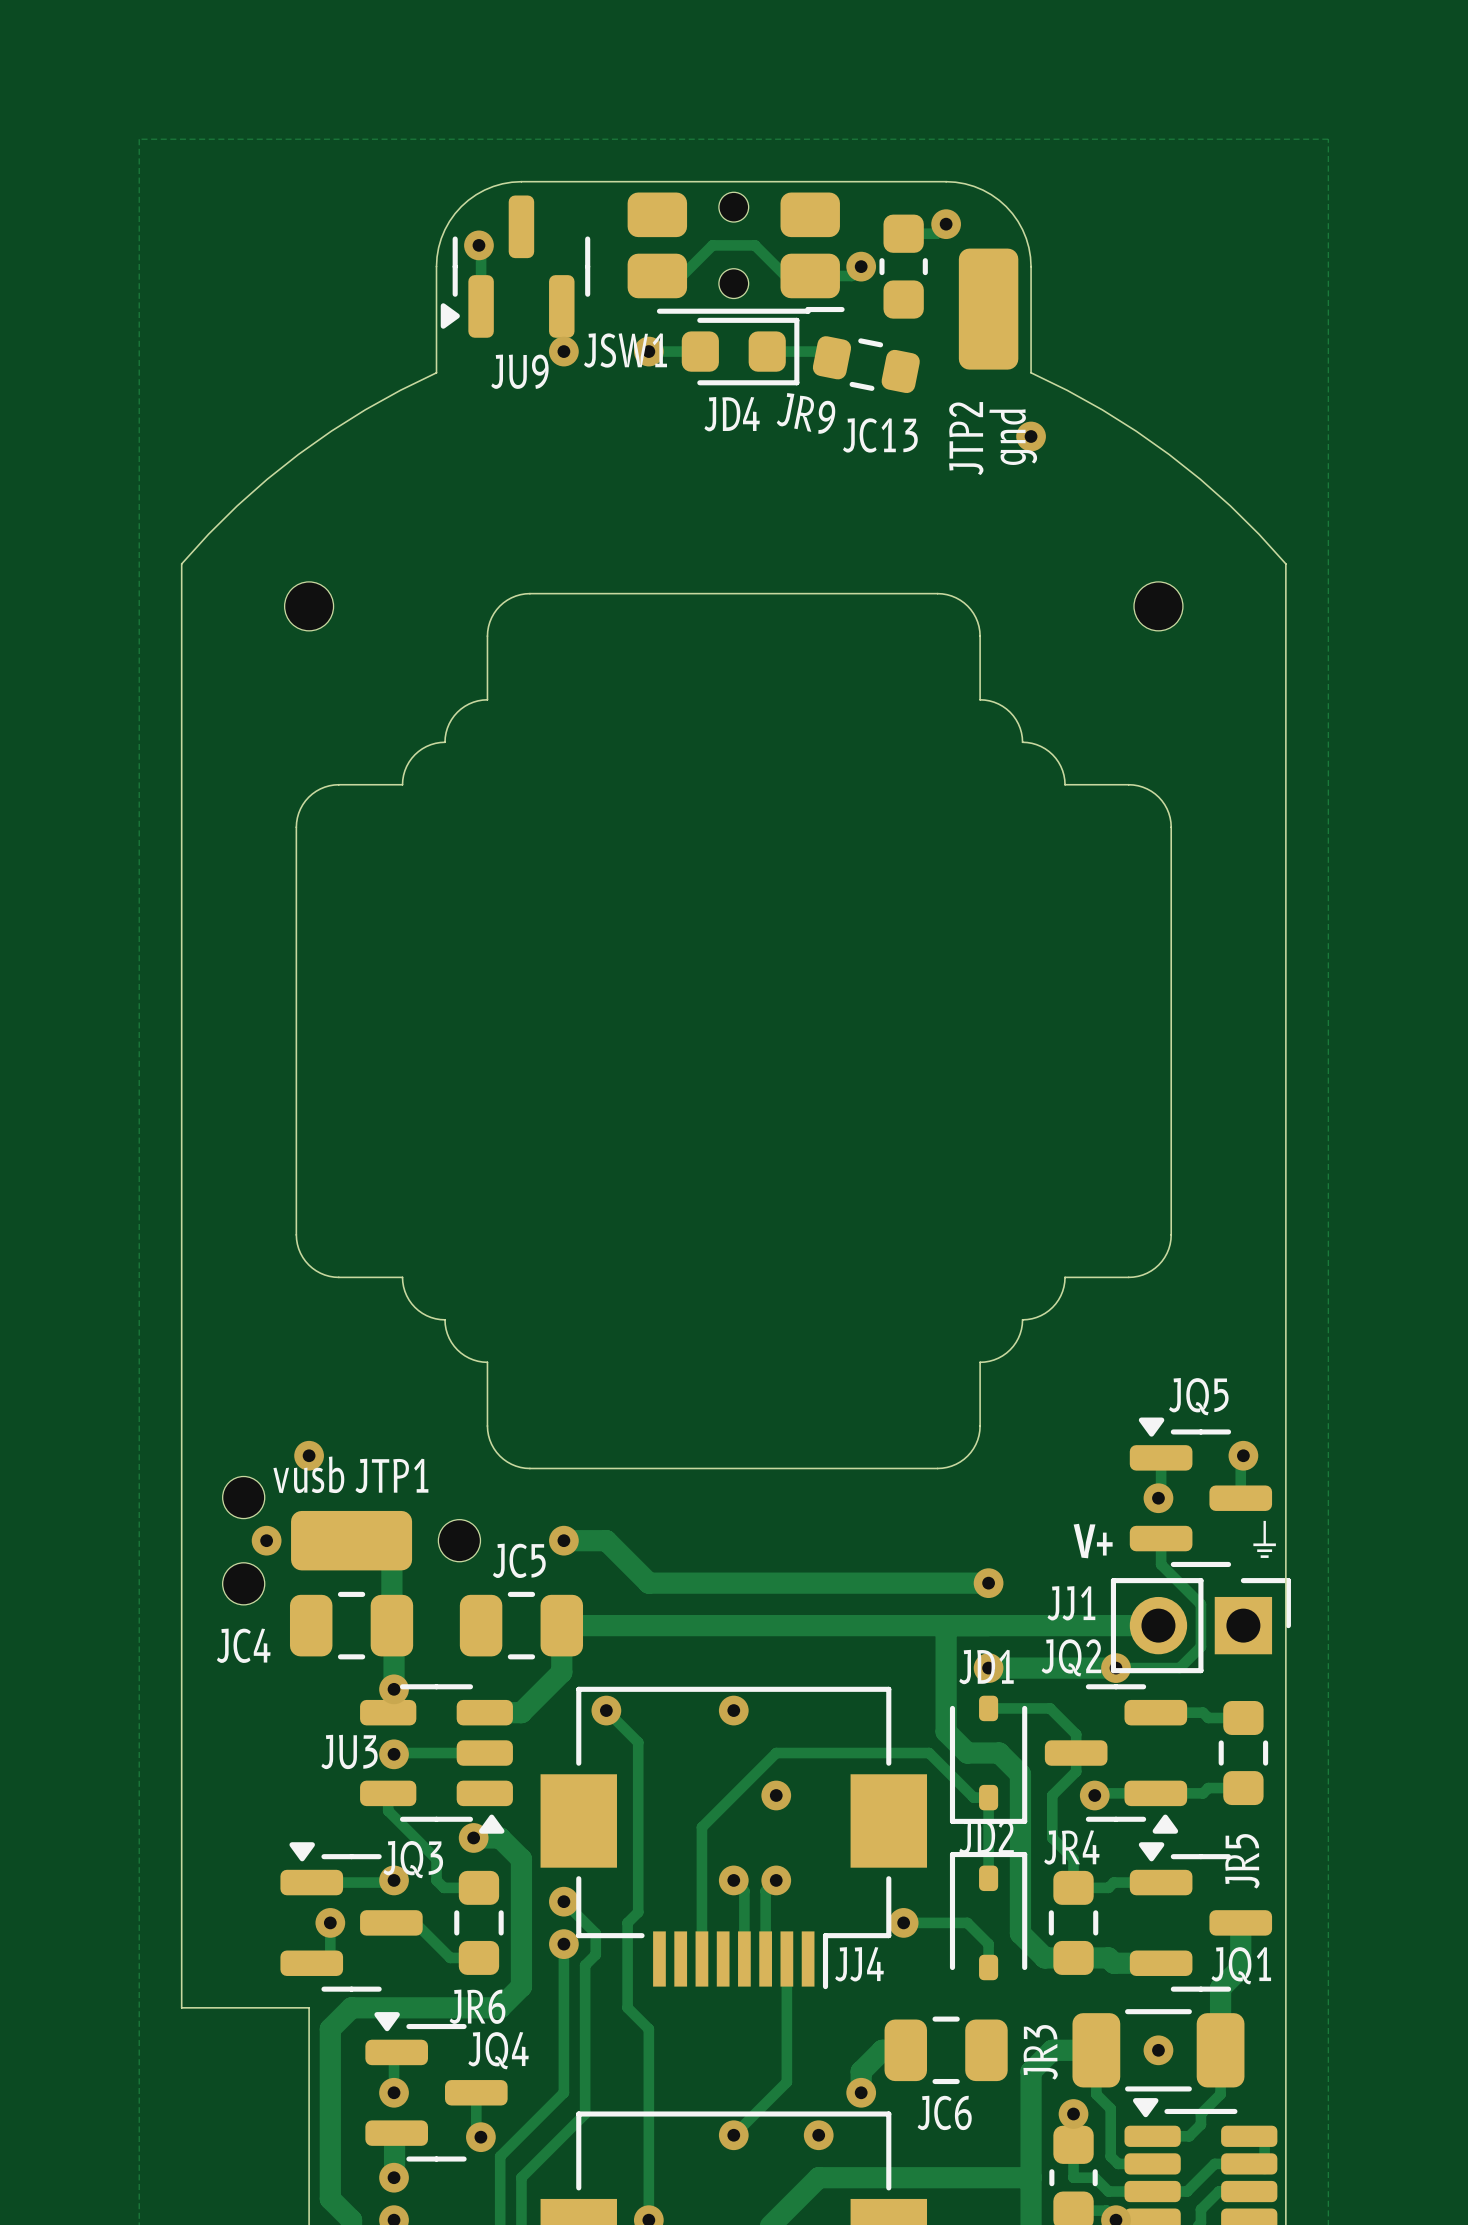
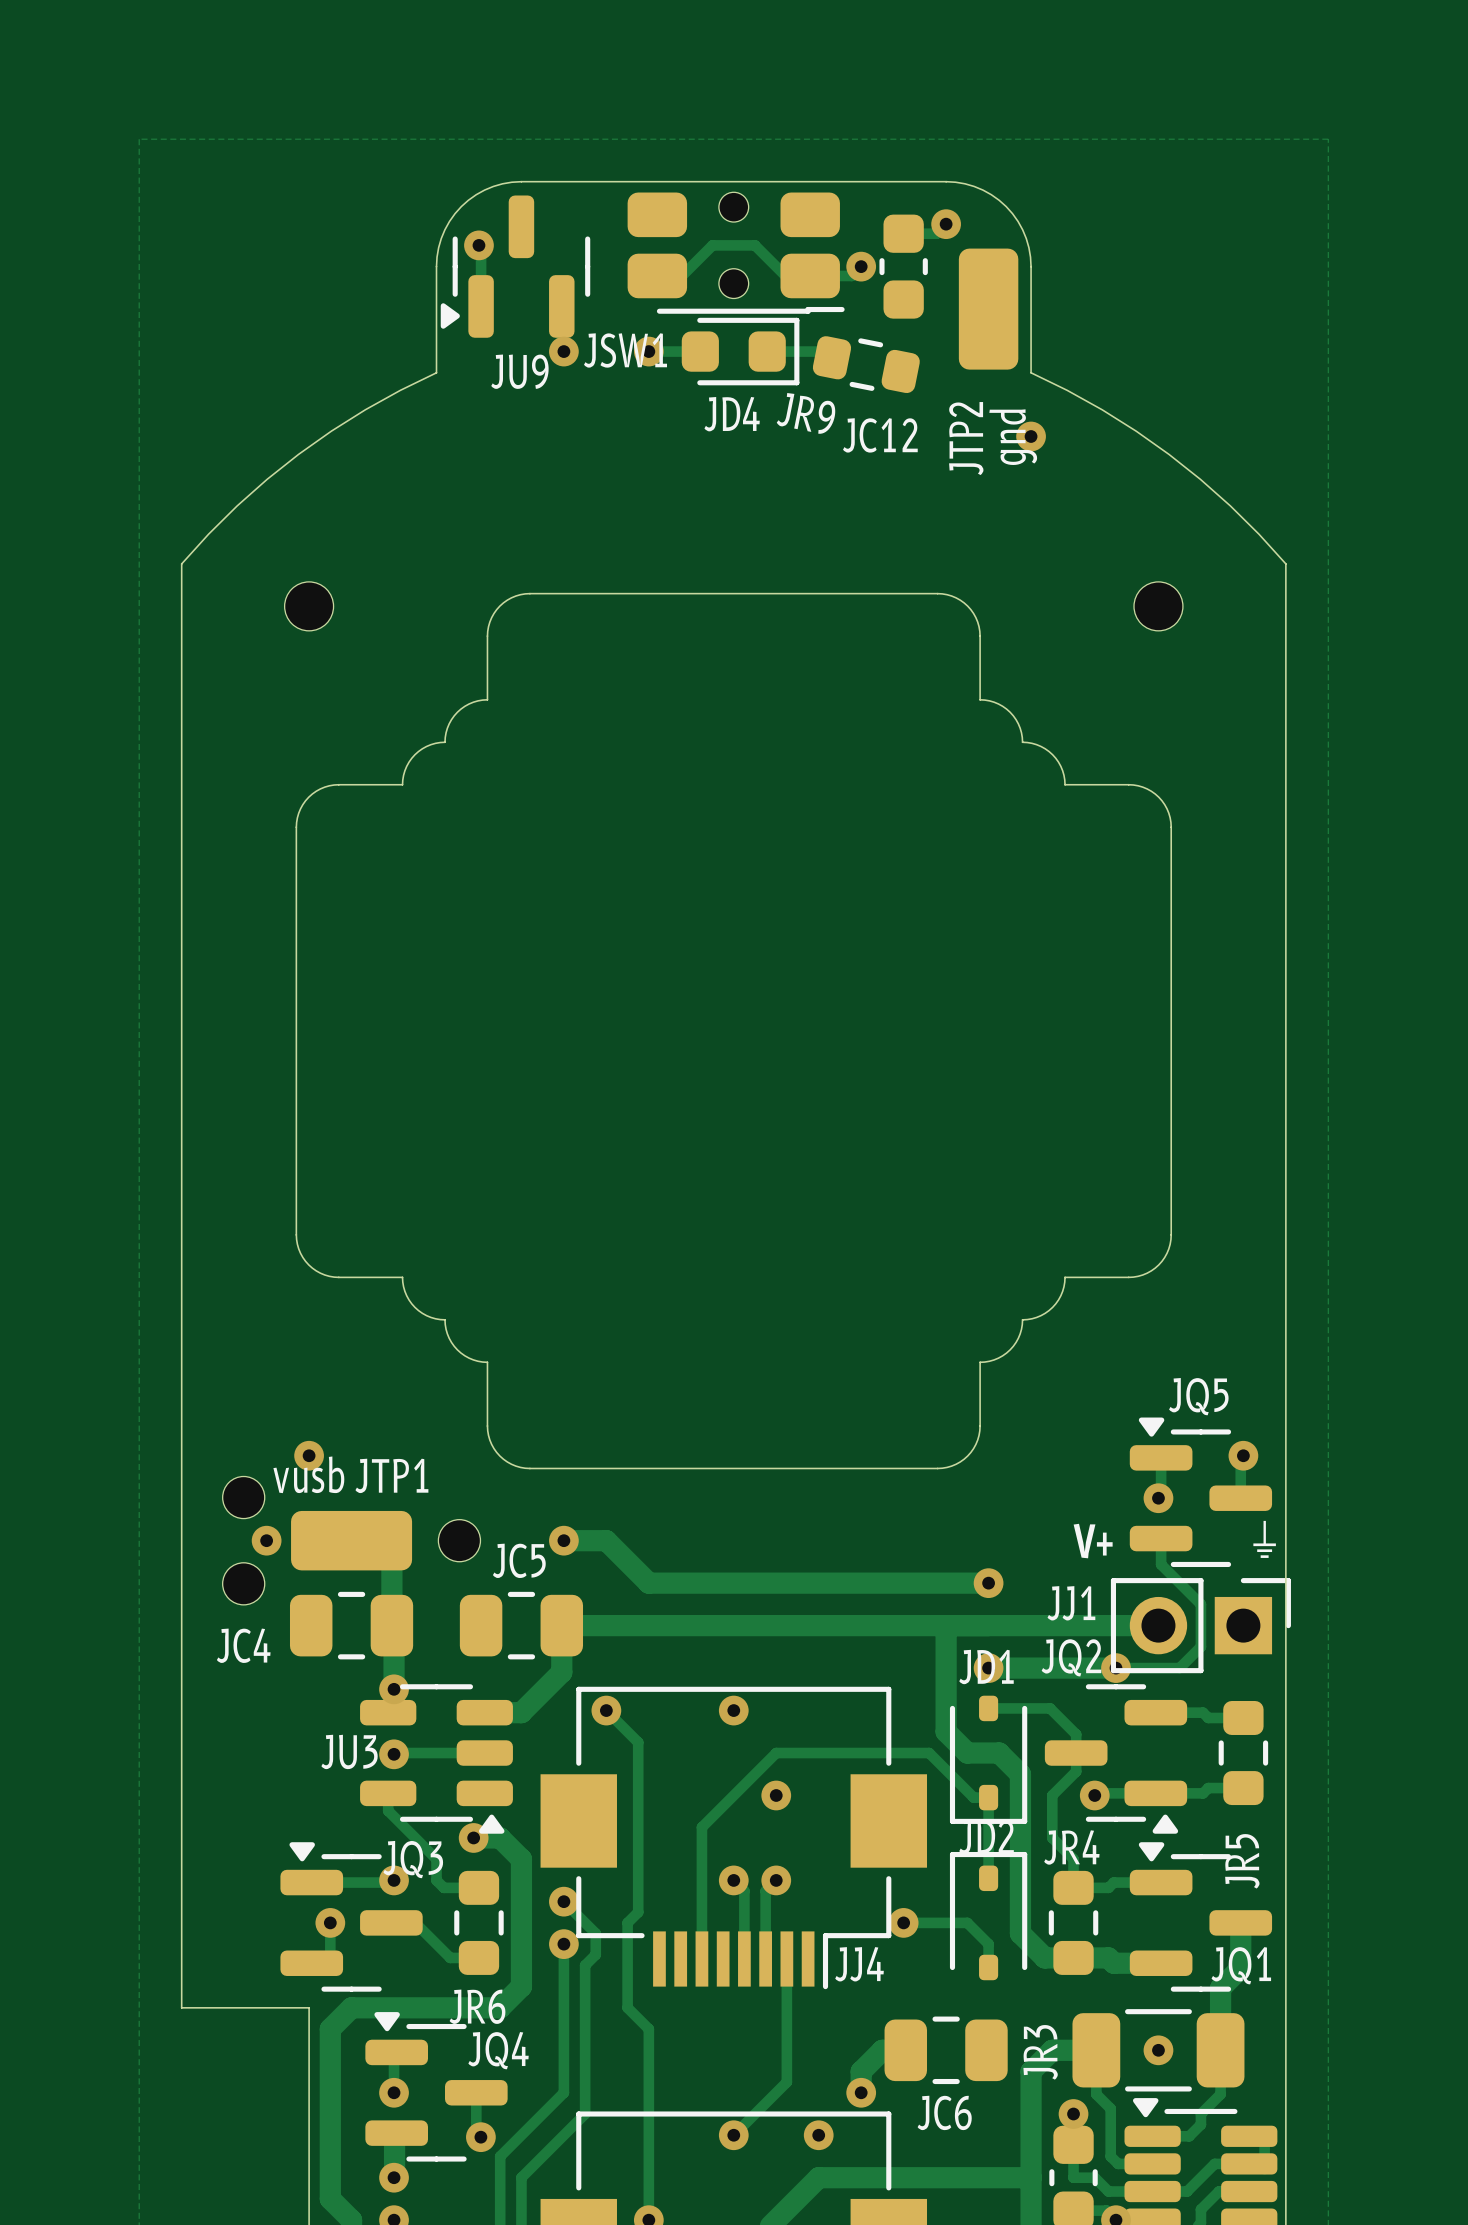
JC13 name: JC13 (880, 435) -> JC12 (880, 435)

